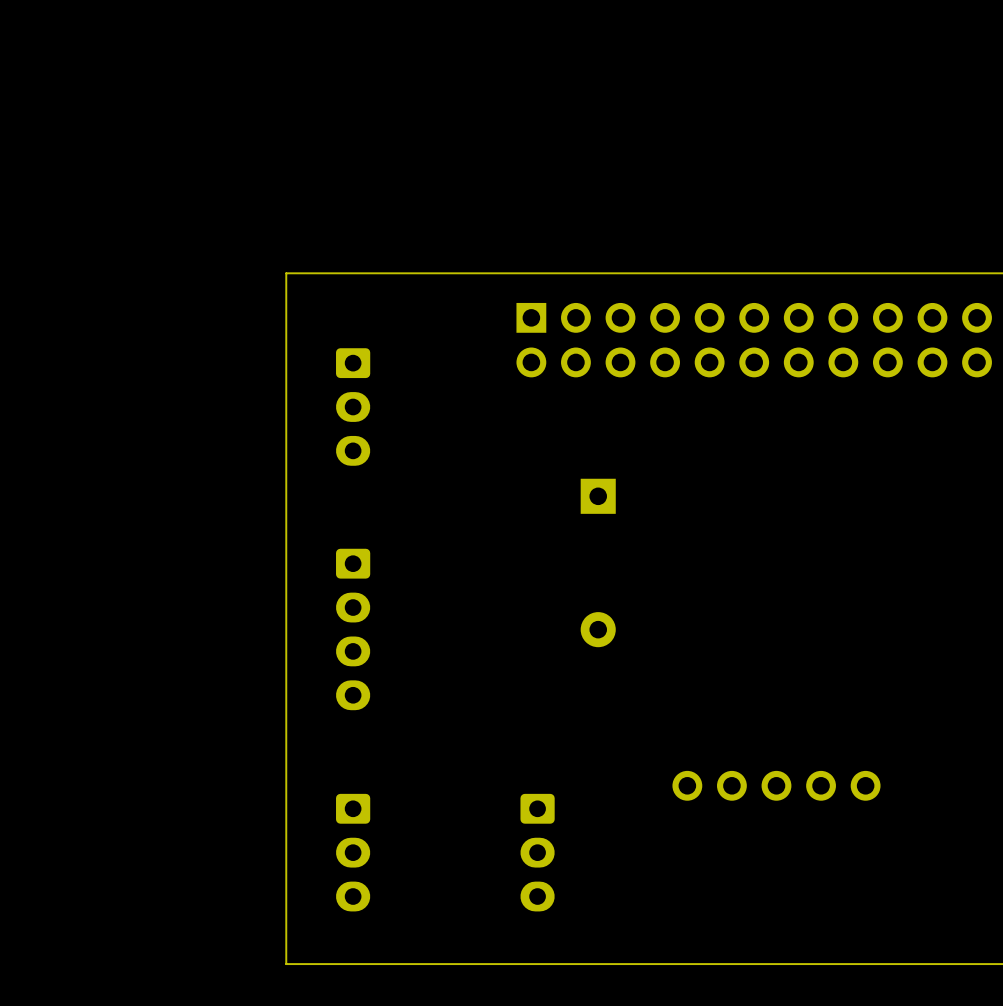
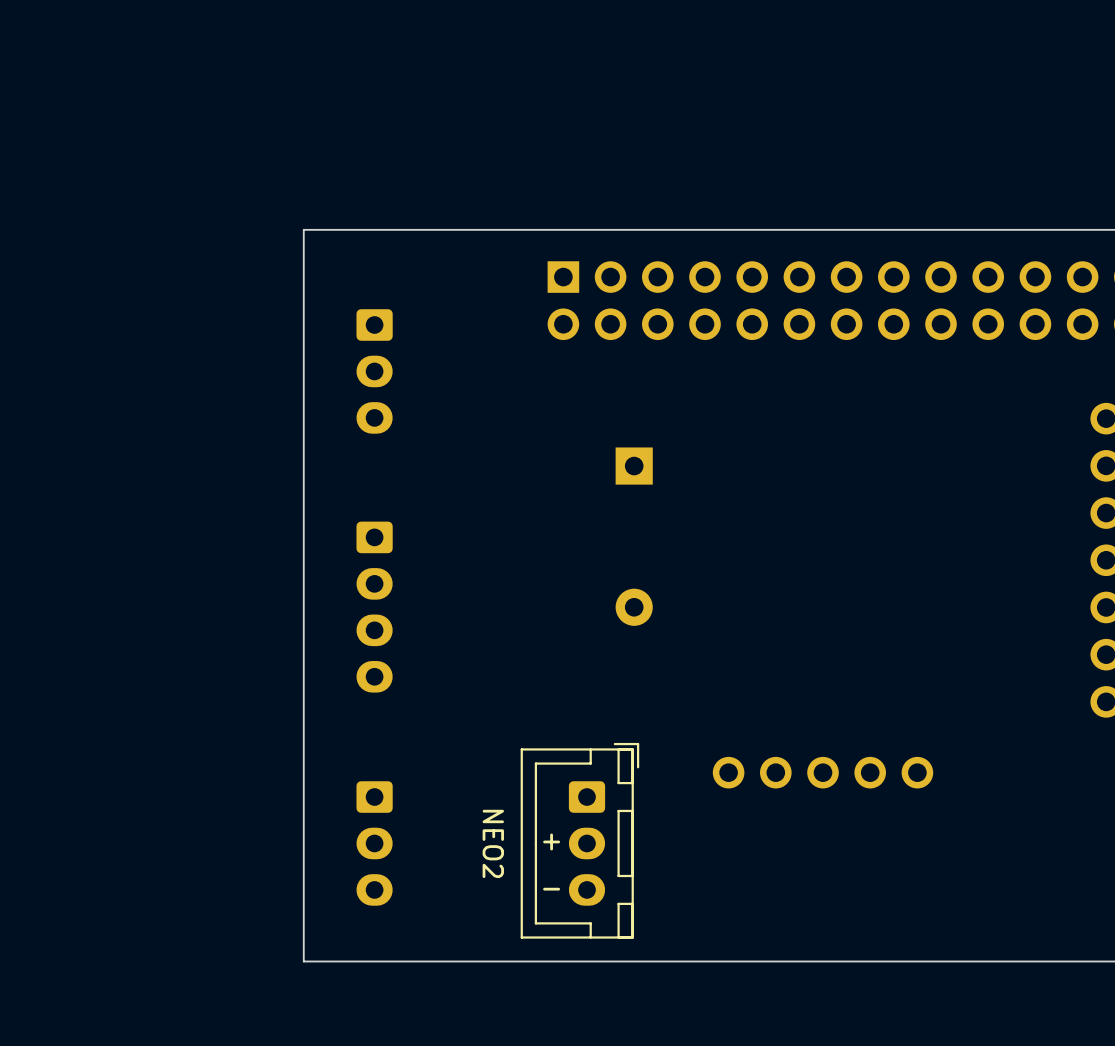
text: none -> + (551, 841)
NEO2 side: top (537, 852) -> bottom (579, 840)
text: none -> - (551, 889)

